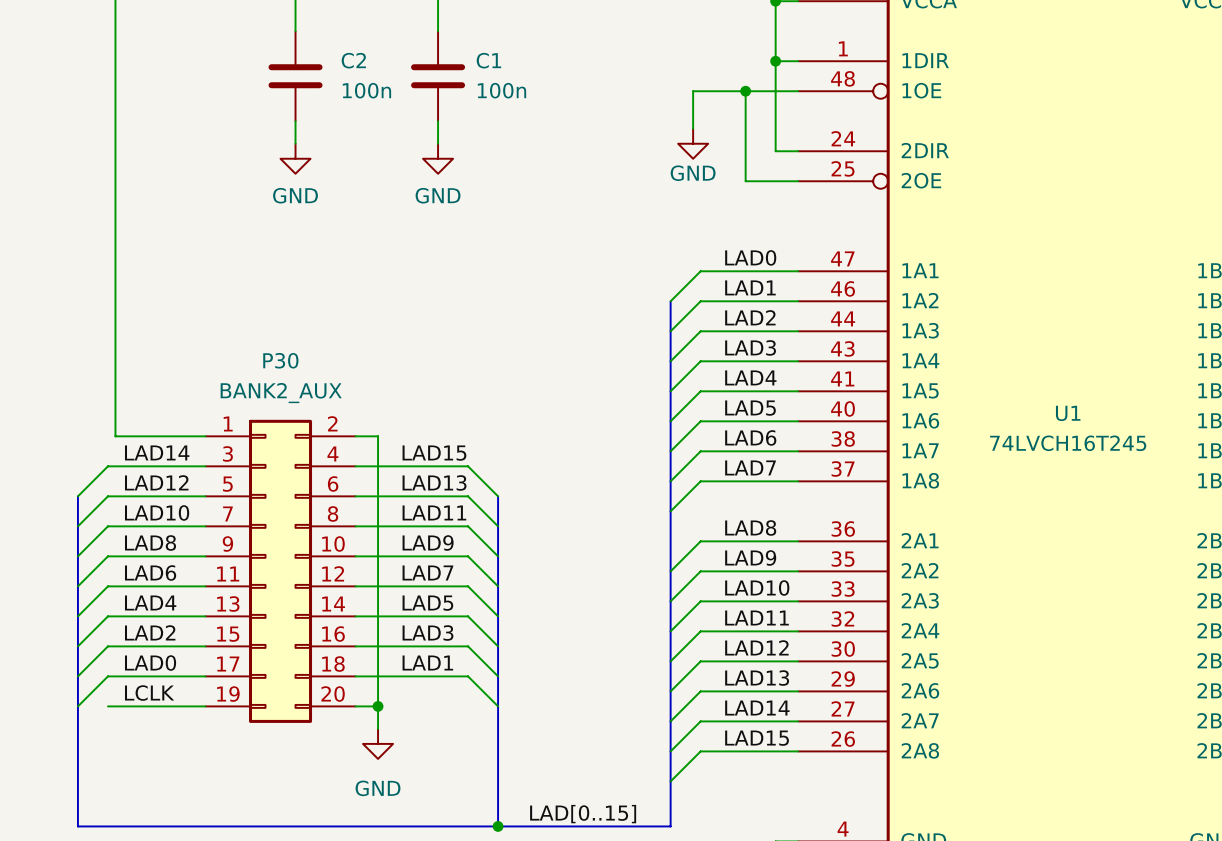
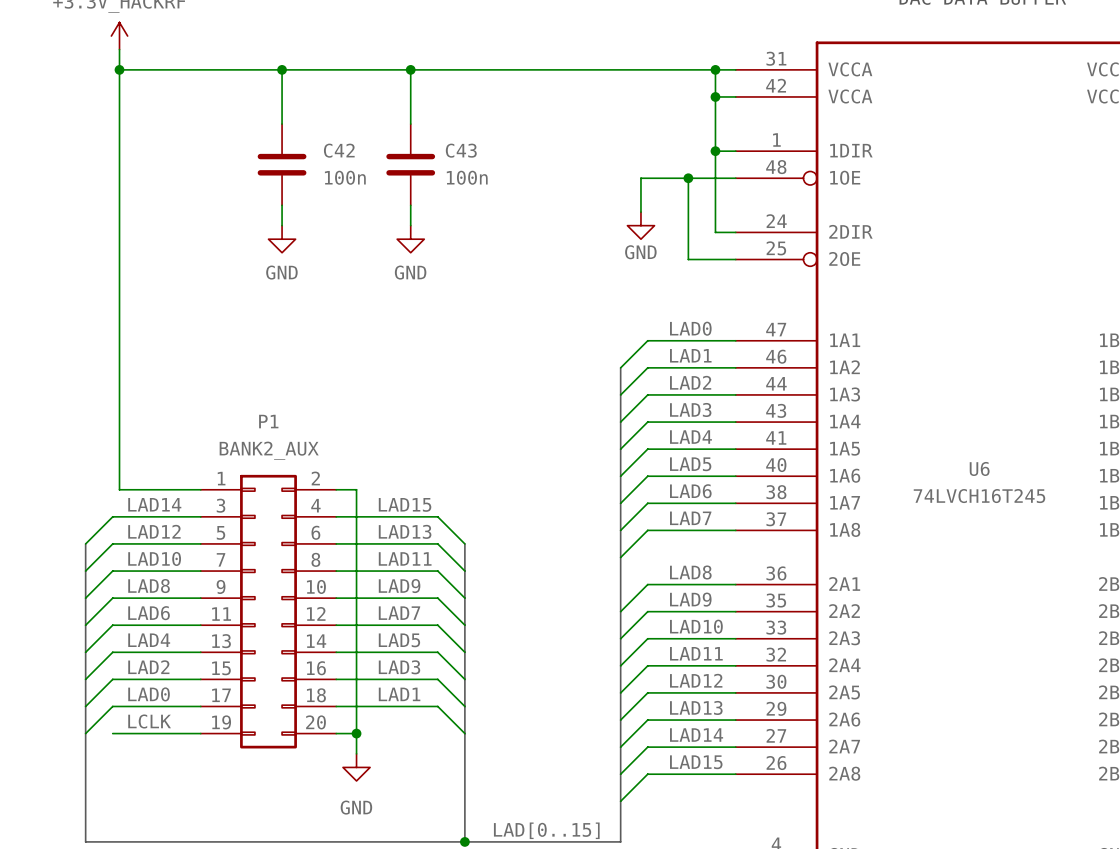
C2 name: C2 (353, 60) -> C42 (339, 150)
C1 name: C1 (488, 60) -> C43 (461, 150)
P30 name: P30 (280, 360) -> P1 (268, 421)
U1 name: U1 (1068, 413) -> U6 (979, 468)

